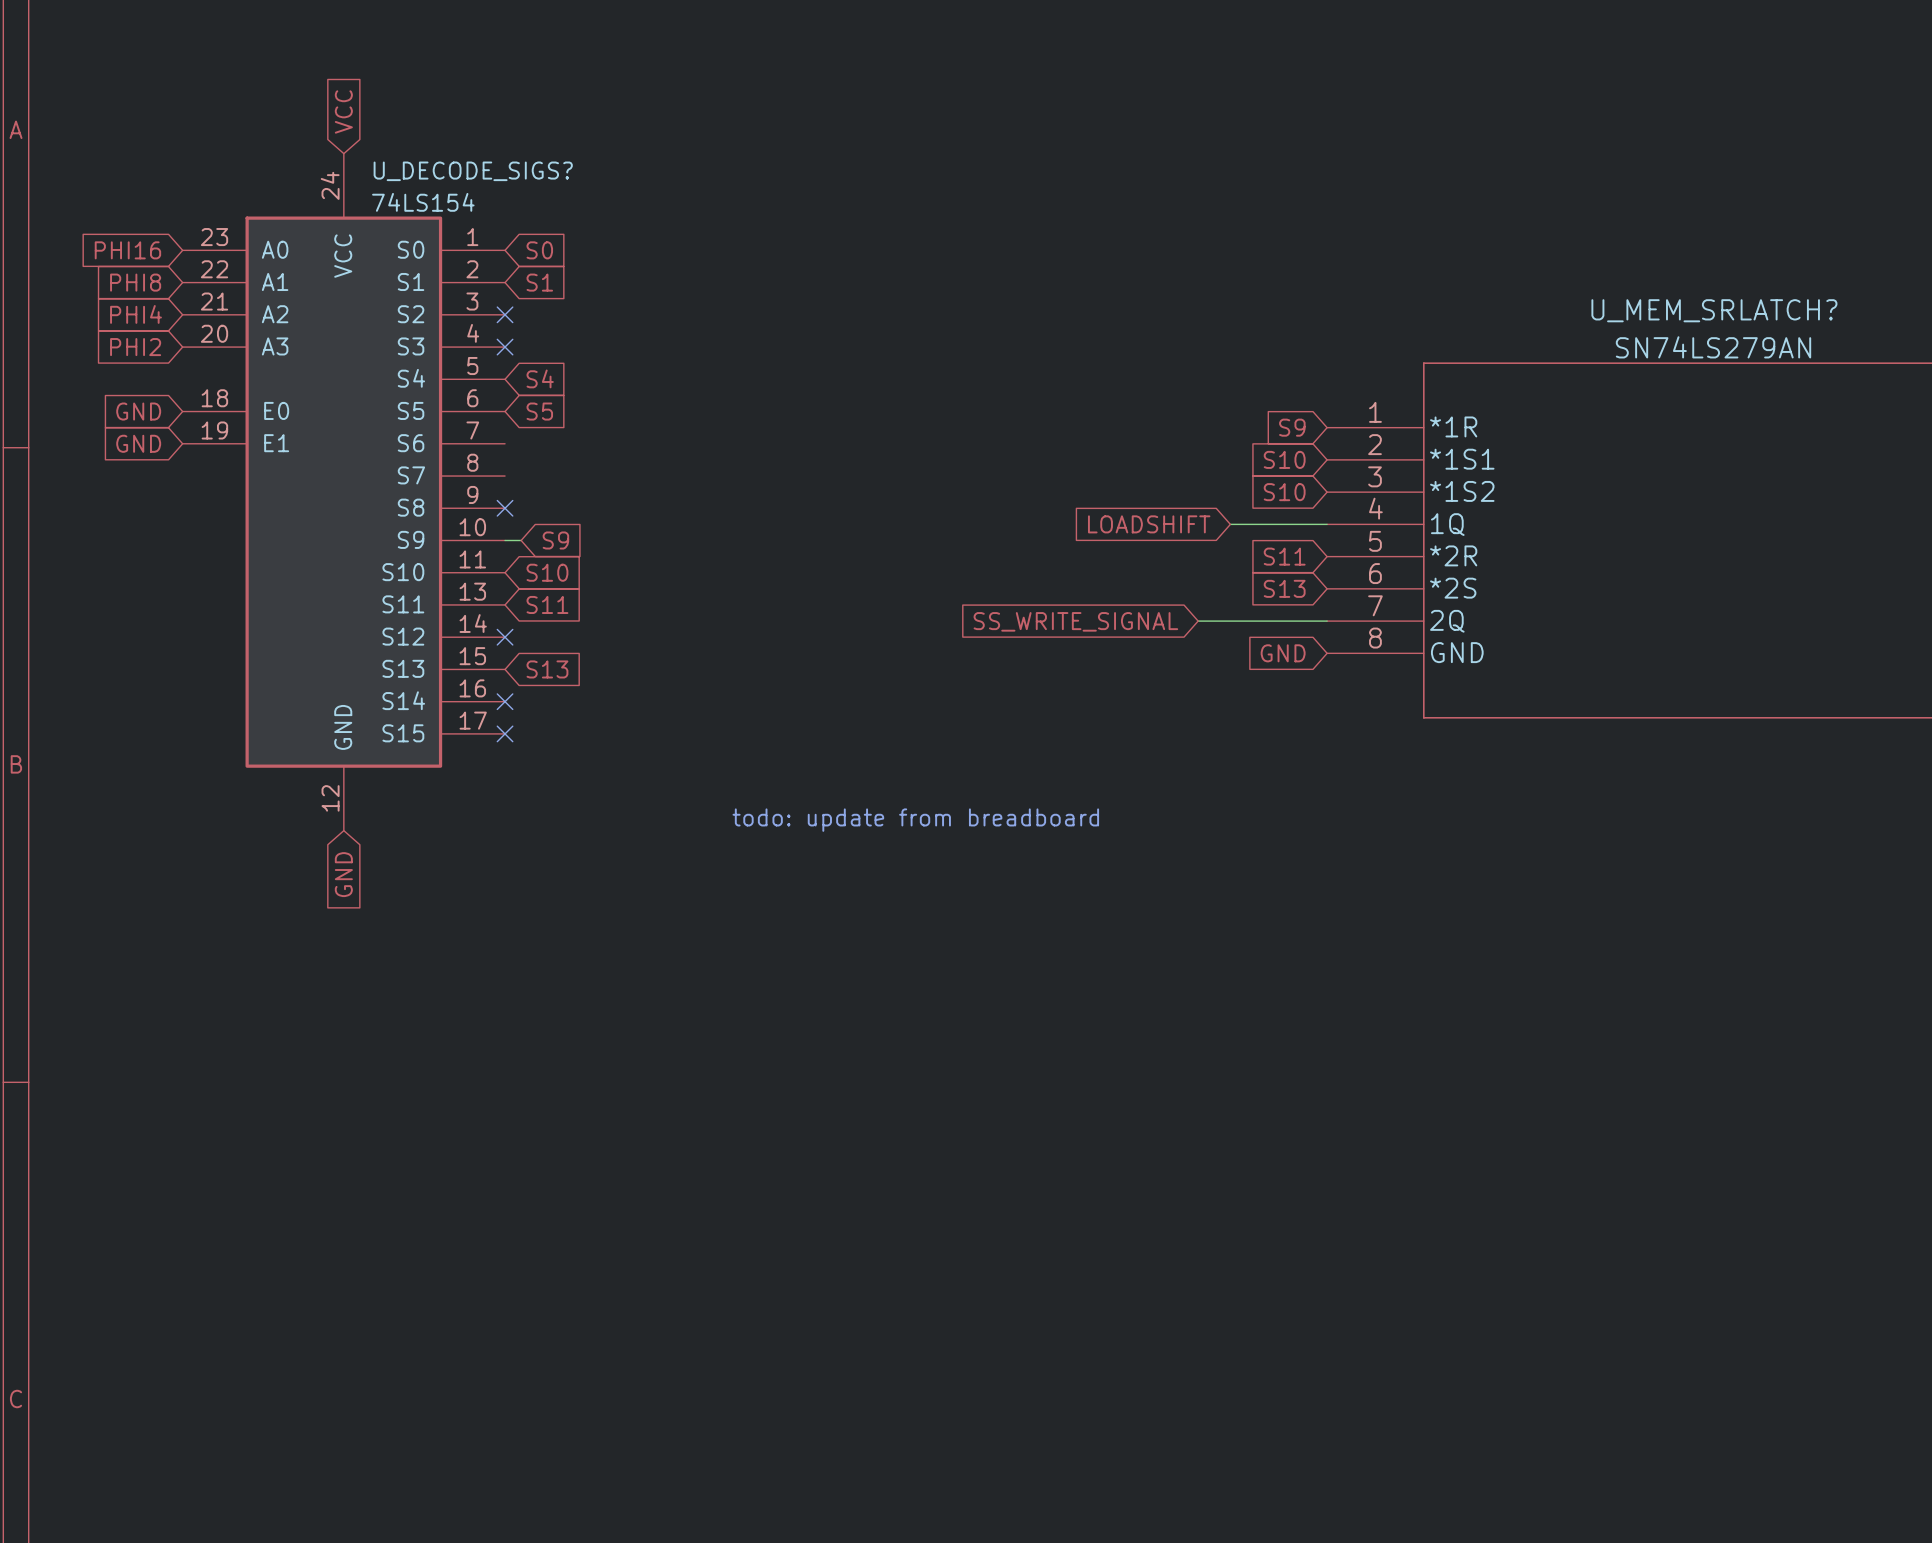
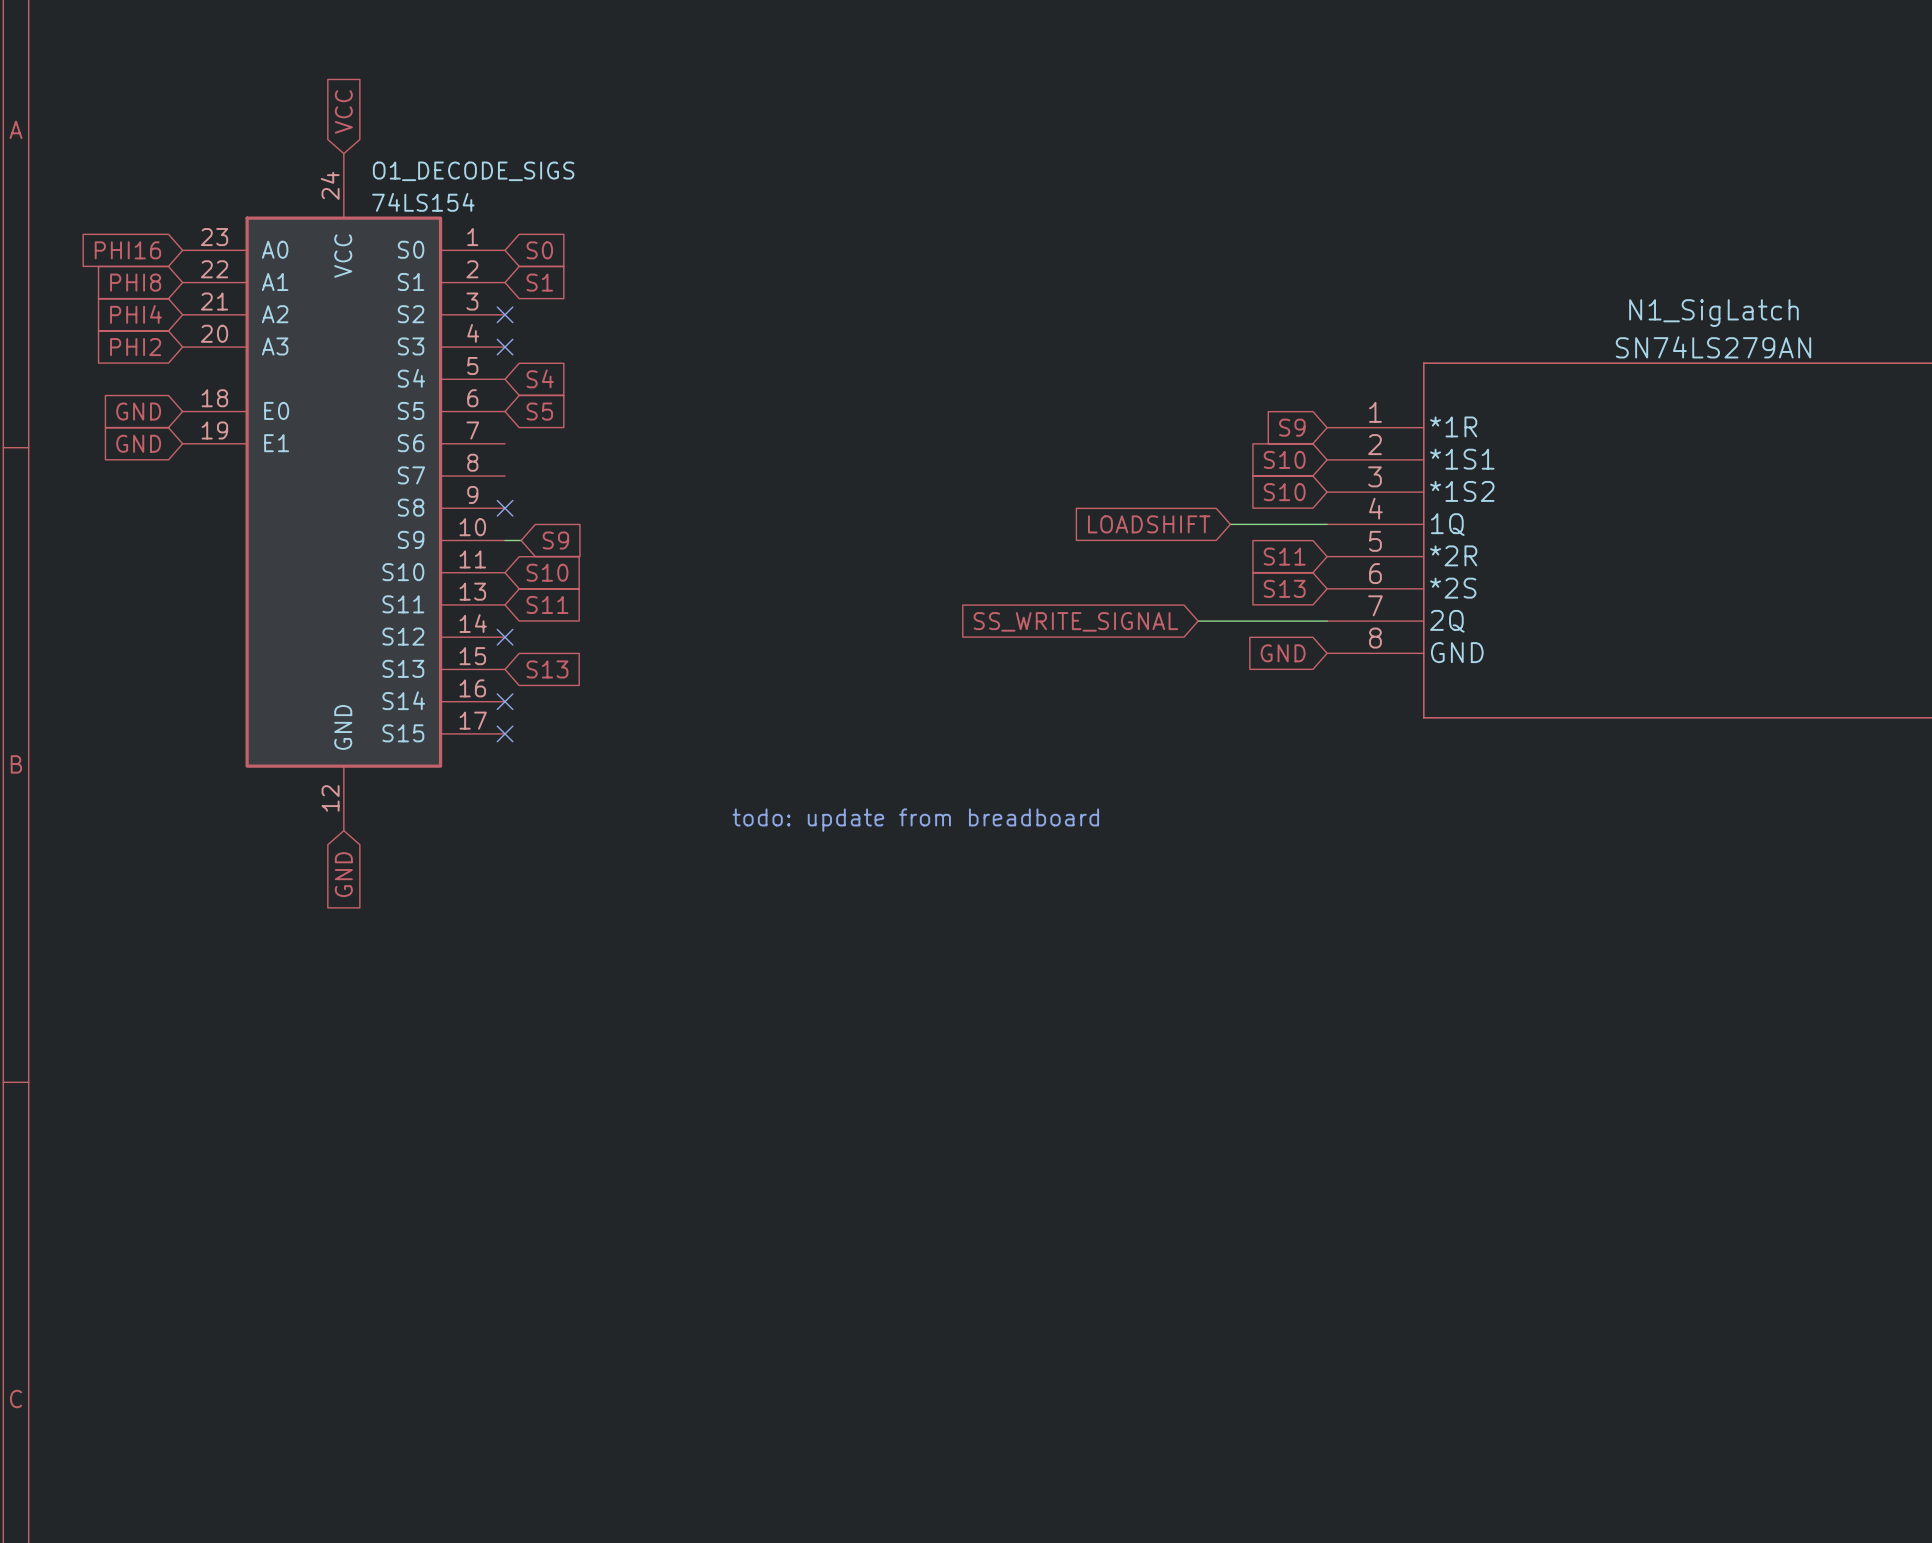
U_DECODE_SIGS? name: U_DECODE_SIGS? (473, 171) -> O1_DECODE_SIGS (473, 171)
U_MEM_SRLATCH? name: U_MEM_SRLATCH? (1714, 310) -> N1_SigLatch (1713, 313)

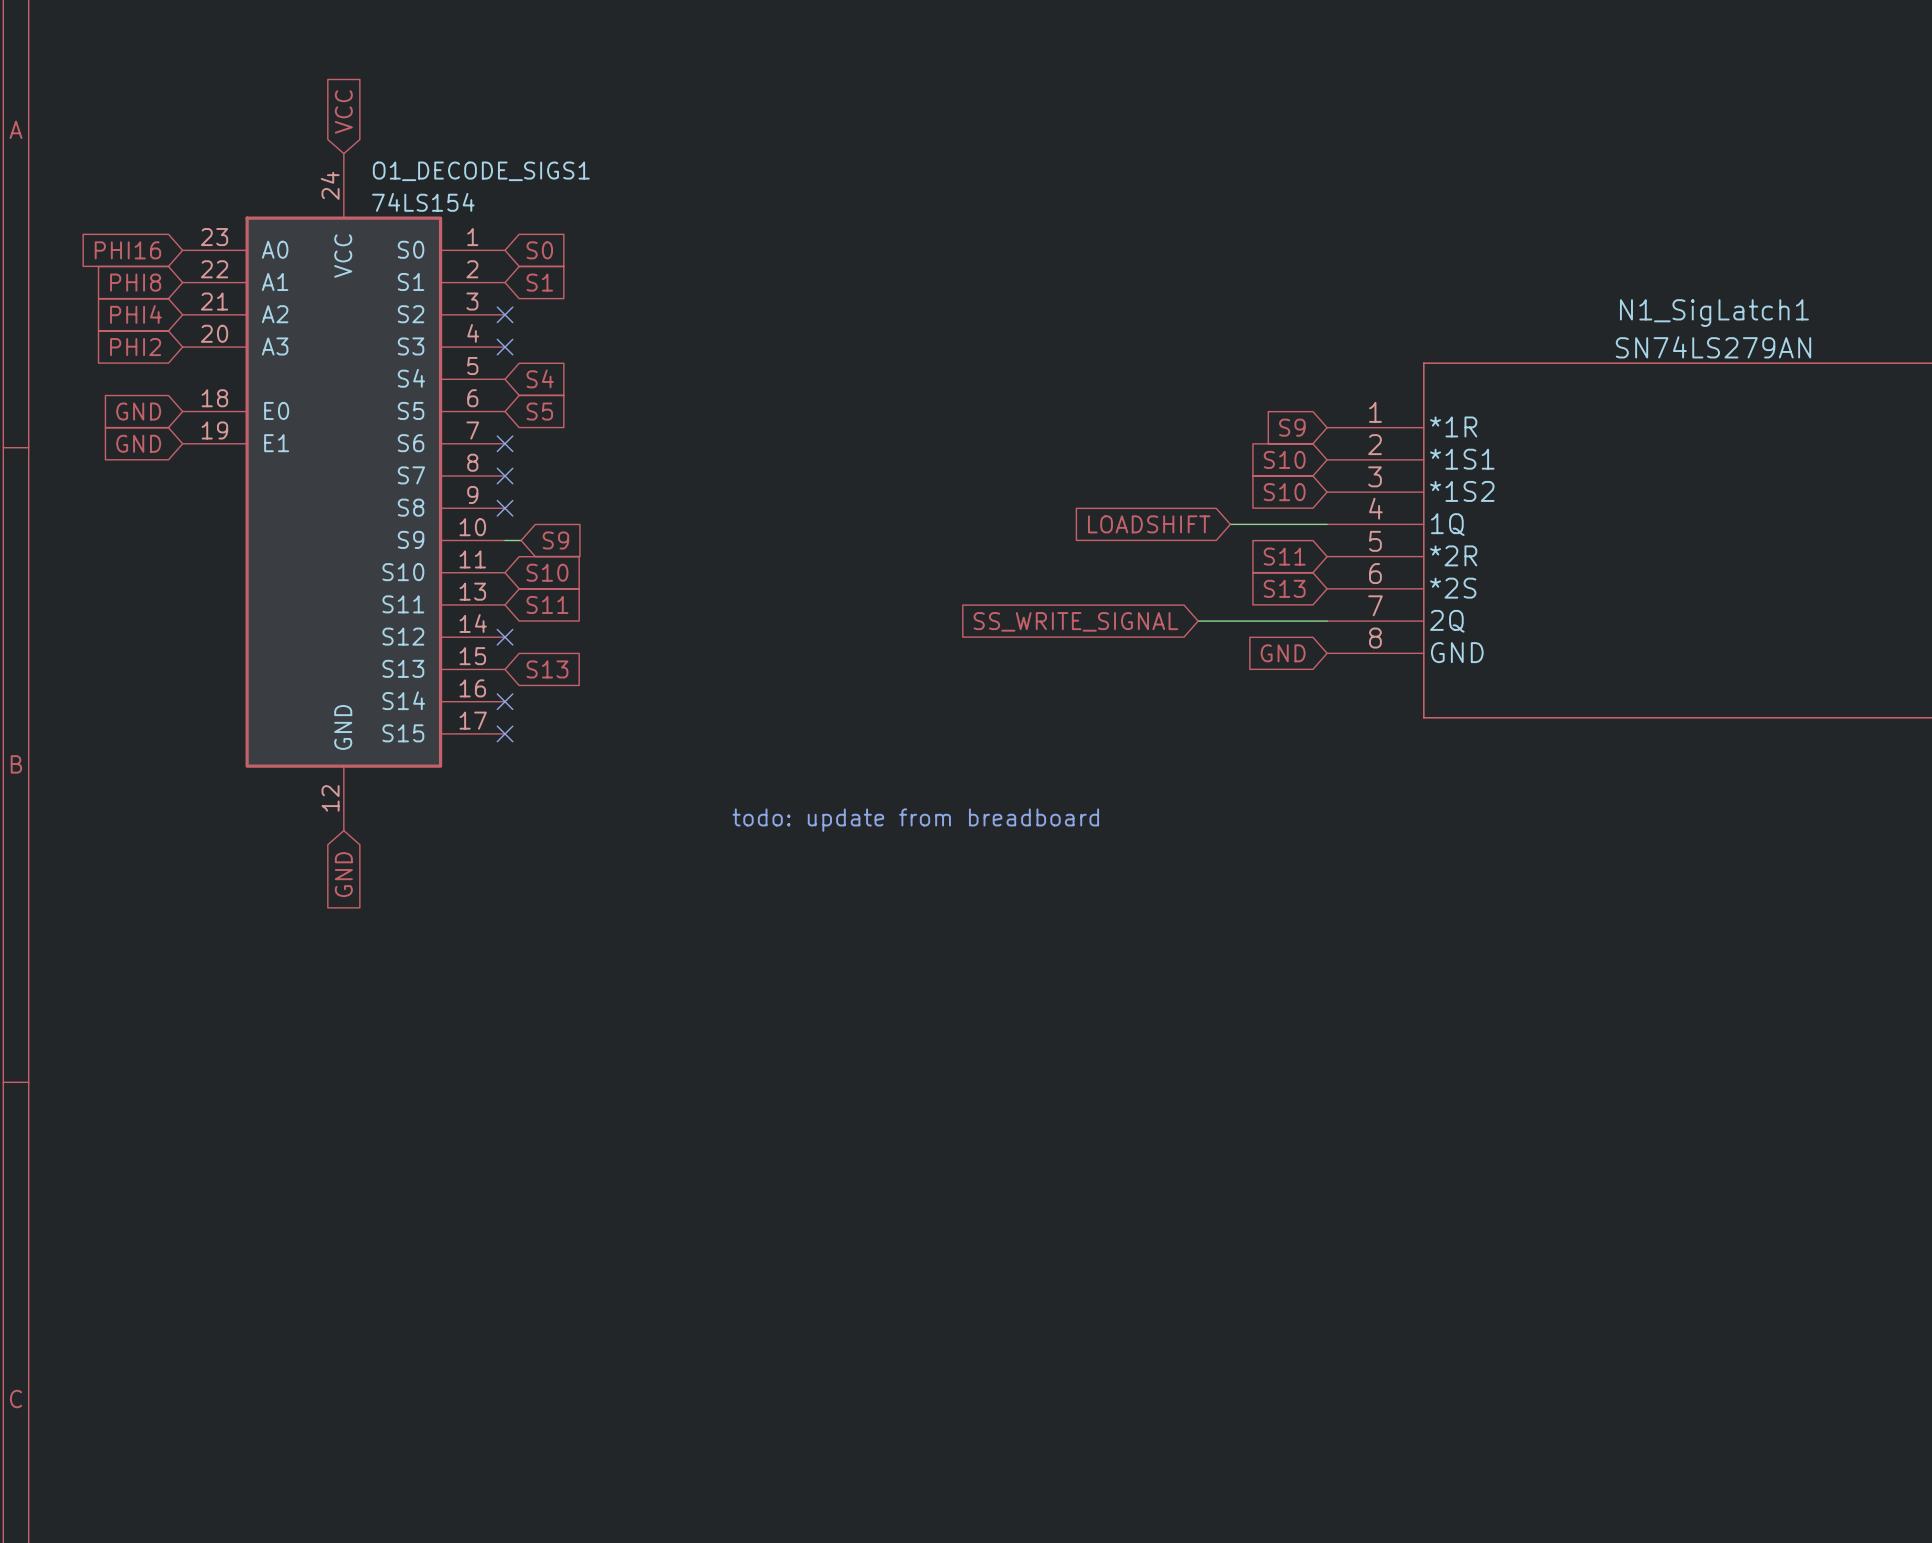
O1_DECODE_SIGS name: O1_DECODE_SIGS (473, 171) -> O1_DECODE_SIGS1 (481, 171)
N1_SigLatch name: N1_SigLatch (1713, 313) -> N1_SigLatch1 (1714, 313)
no-connect mark: none -> (505, 443)
no-connect mark: none -> (505, 476)

